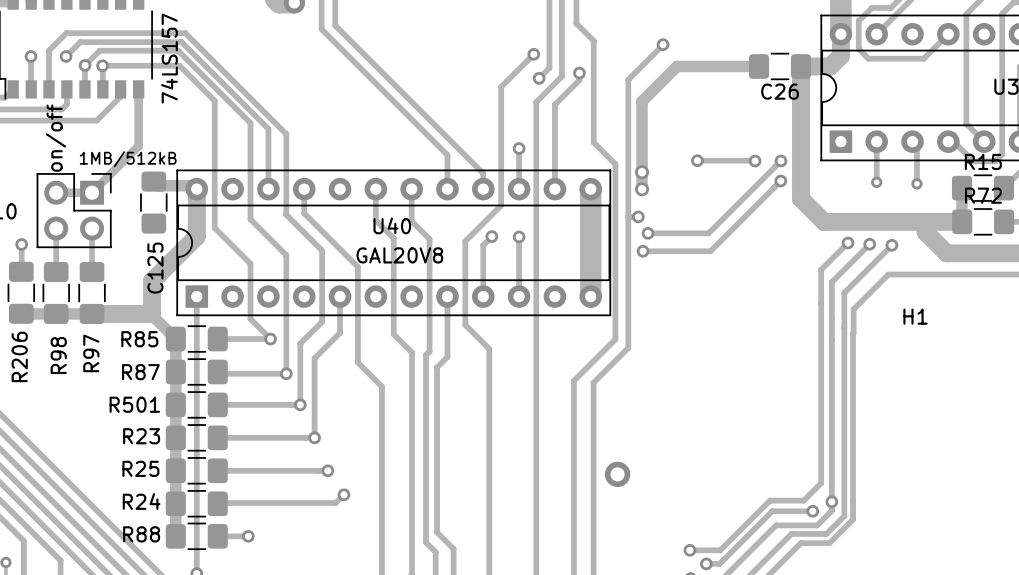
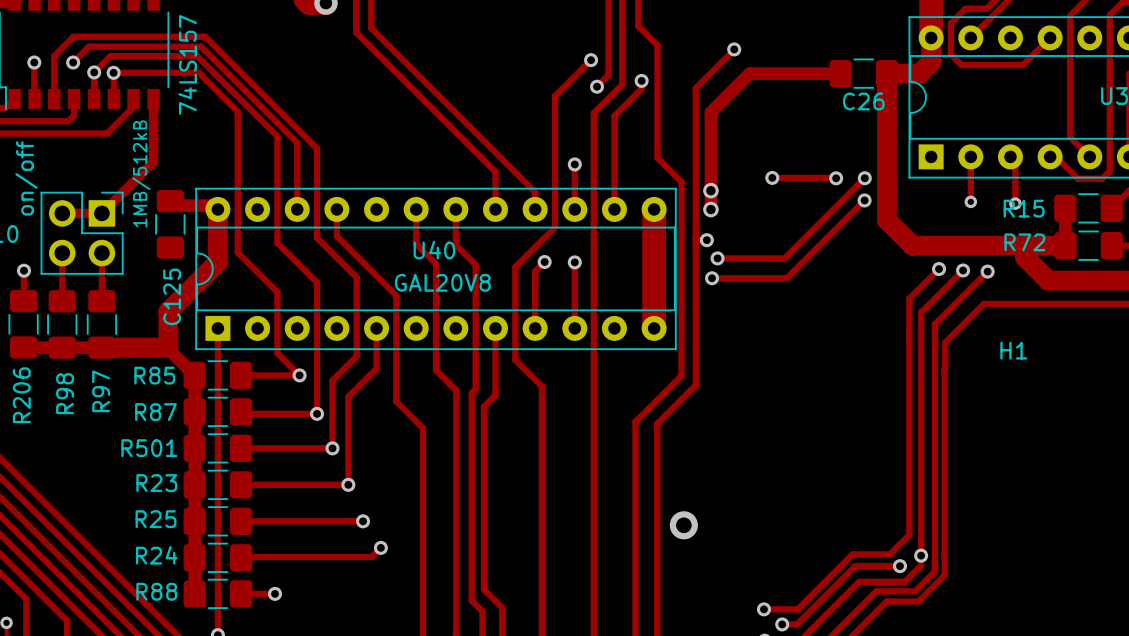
text position: on/off (55, 138) -> on/off (26, 178)
text rotation: 0° (128, 159) -> 90° counterclockwise (141, 173)
R15 name position: R15 (983, 161) -> R15 (1024, 208)
R72 name position: R72 (983, 195) -> R72 (1024, 242)

